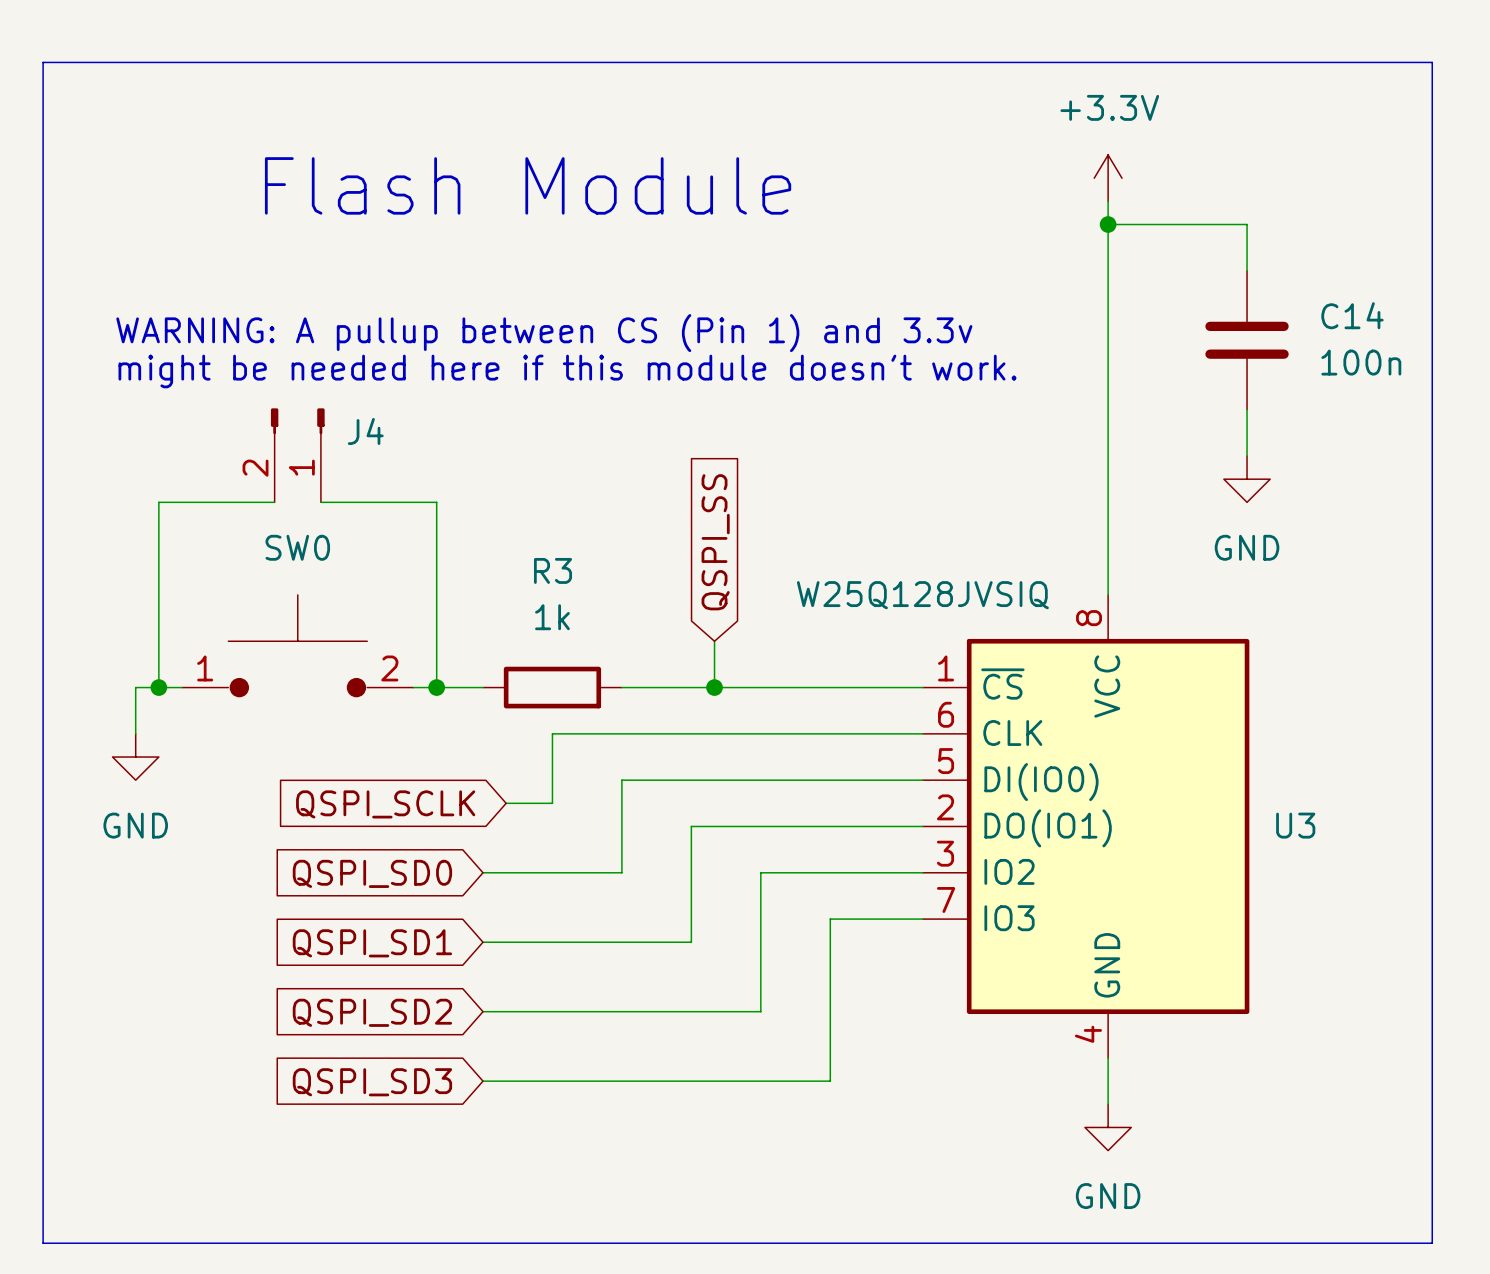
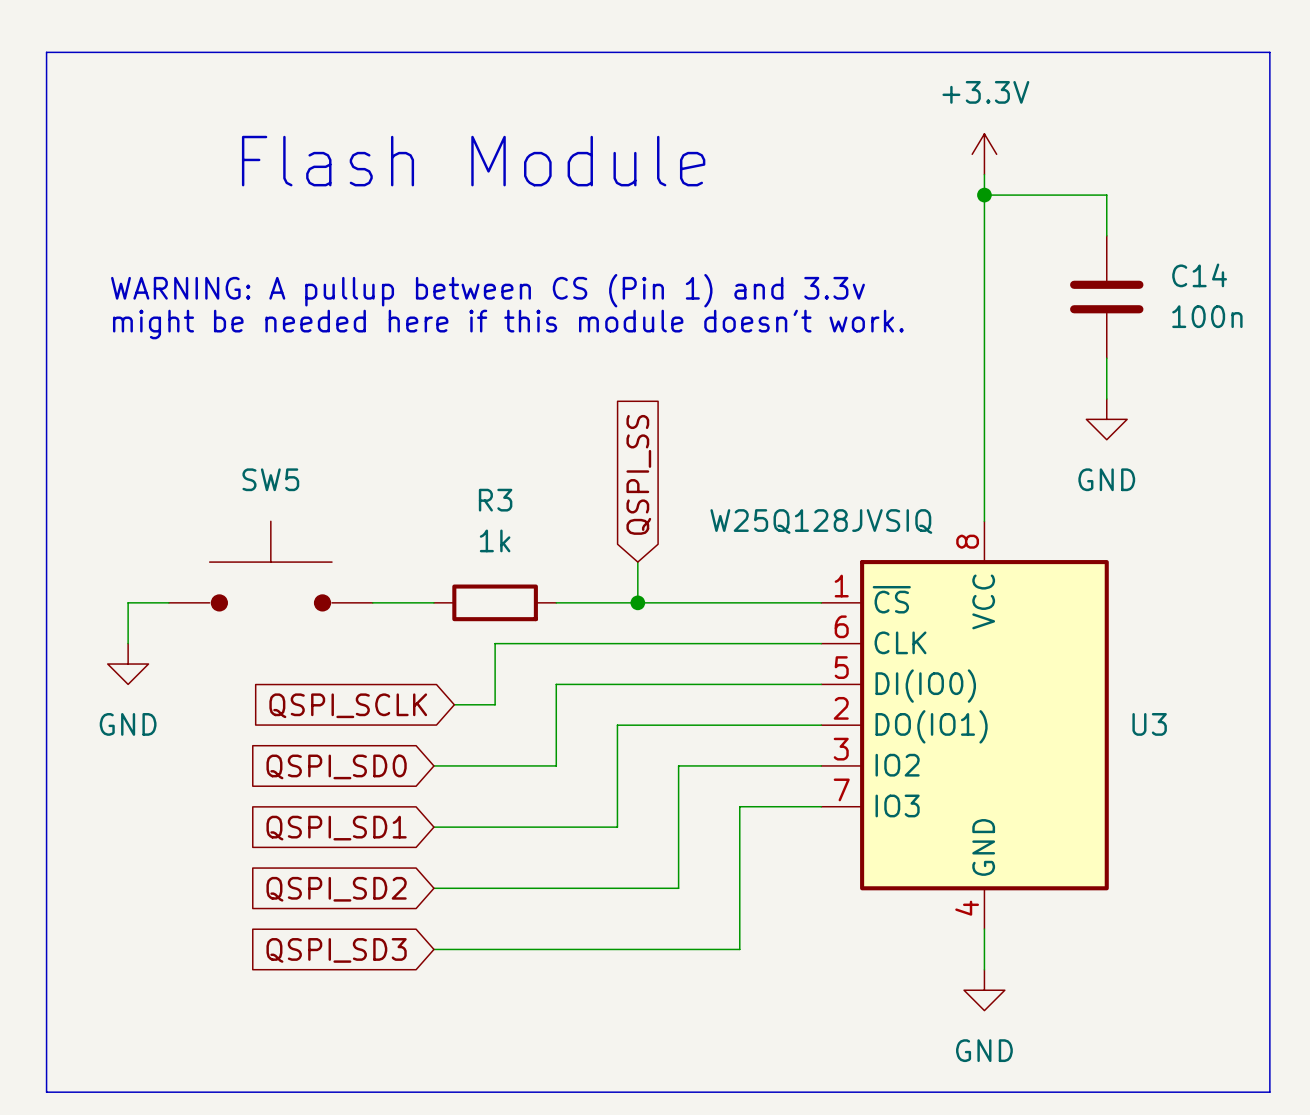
J4: (297, 455) -> none
wire: (274, 502) (158, 502) (158, 687) -> none
wire: (320, 502) (436, 502) (436, 687) -> none
SW0 name: SW0 (297, 547) -> SW5 (270, 479)
SW0 pin number: 1 (205, 668) -> none
SW0 pin number: 2 (389, 668) -> none
junction: (158, 687) -> none
junction: (436, 687) -> none

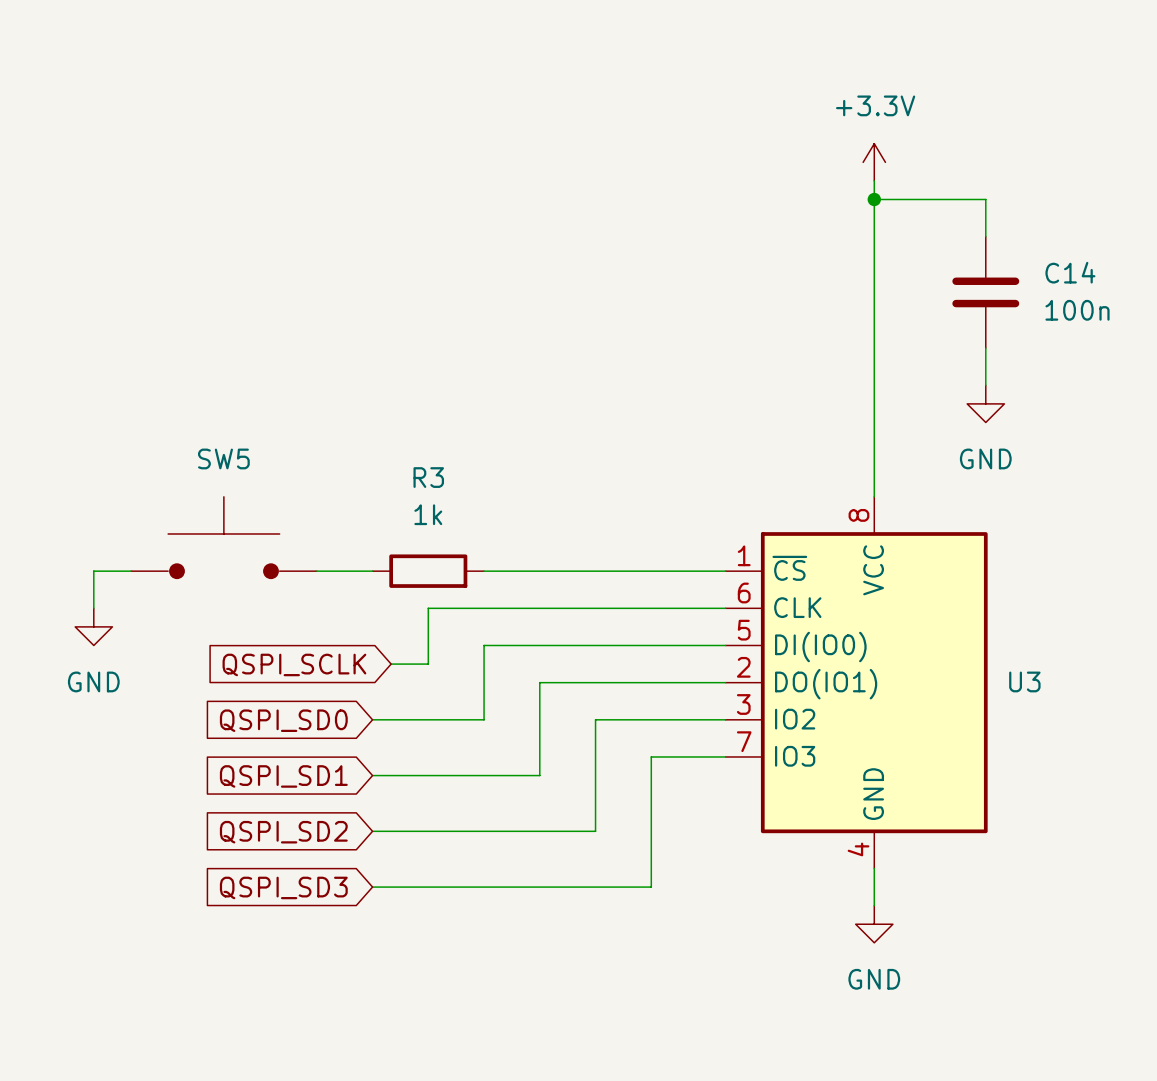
line: (46, 52) (1269, 52) (1269, 1092) (46, 1092) (46, 52) -> none
text: Flash Module (473, 161) -> none
text: WARNING: A pullup between CS (Pin 1) and 3.3v (487, 290) -> none
text: might be needed here if this module doesn't work. (508, 324) -> none
global label: QSPI_SS (638, 474) -> none
U3 text: W25Q128JVSIQ (821, 521) -> none
wire: (637, 562) (637, 602) -> none
junction: (637, 602) -> none

